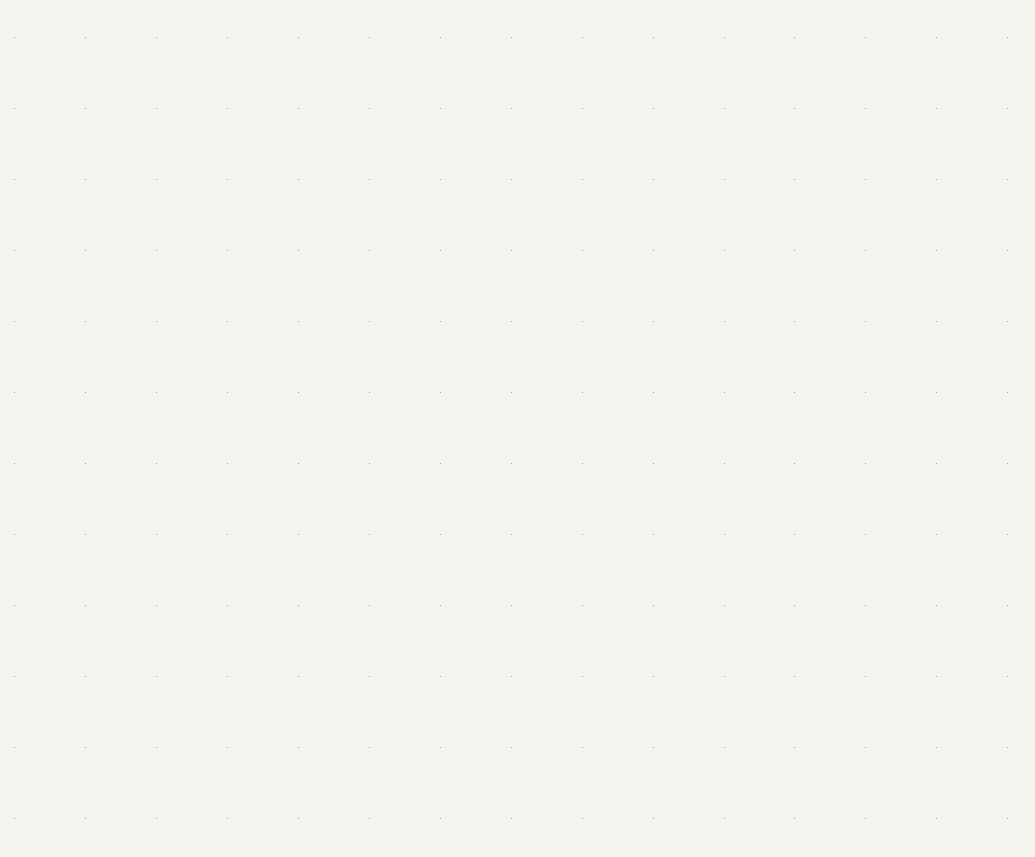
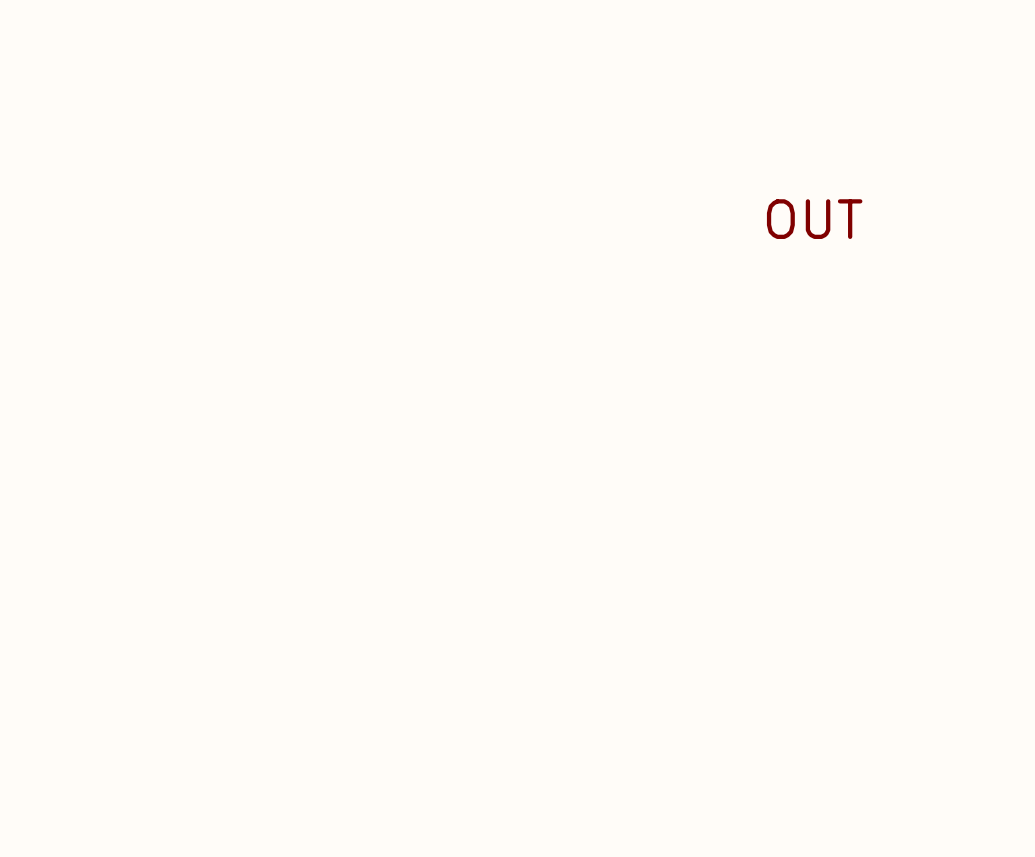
label: none -> OUT (814, 219)

